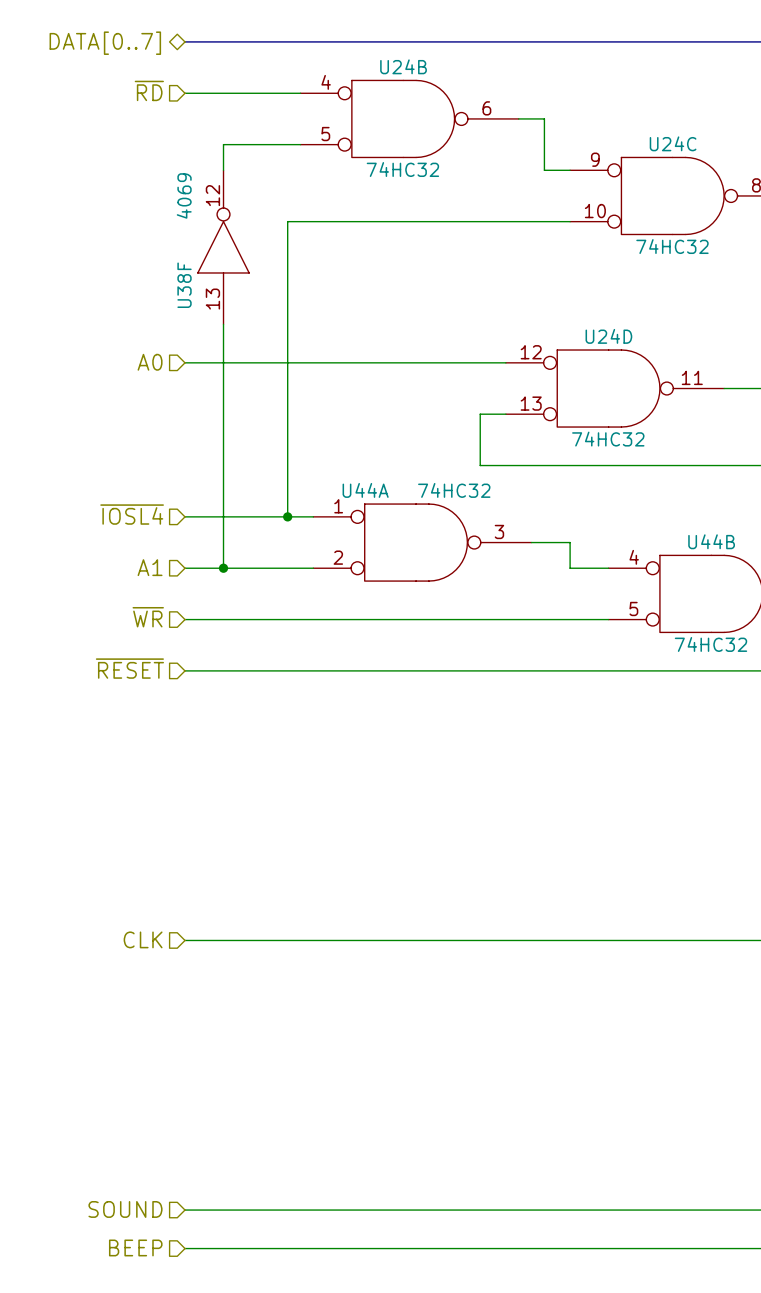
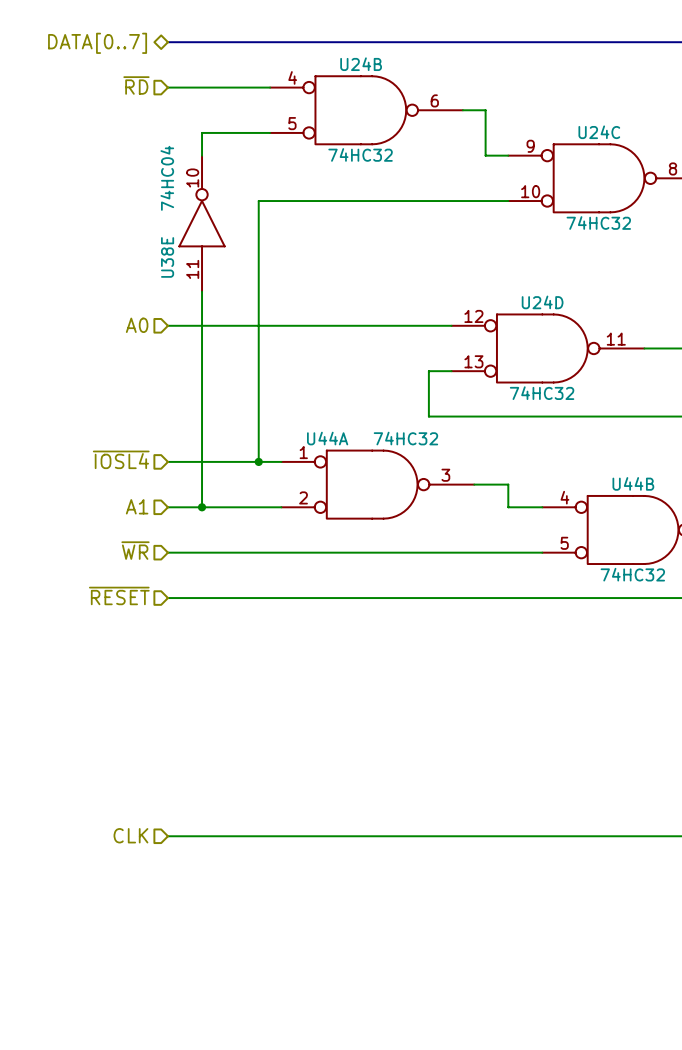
U38F value: 4069 (184, 195) -> 74HC04 (167, 178)
U38F pin number: 12 (212, 195) -> 10 (192, 177)
U38F name: U38F (184, 285) -> U38E (167, 257)
U38F pin number: 13 (212, 299) -> 11 (192, 269)

